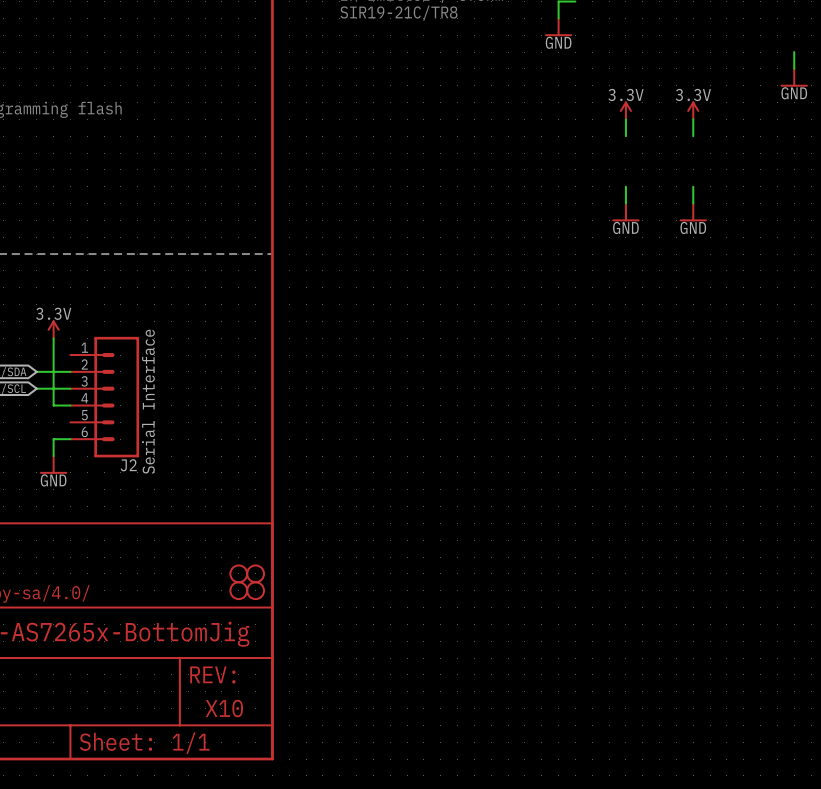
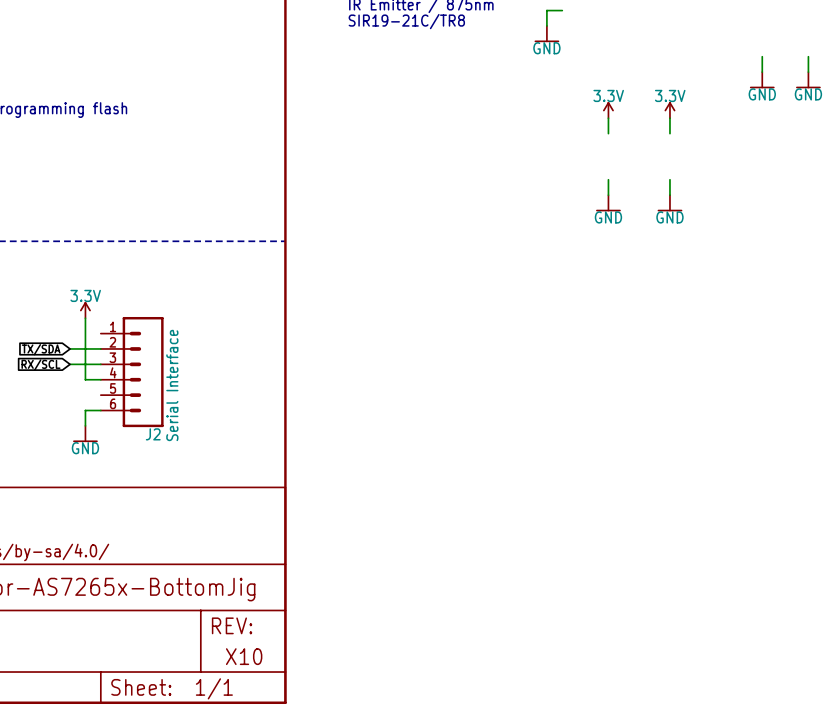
part: (238, 573) -> none
part: (255, 573) -> none
part: (238, 590) -> none
part: (255, 590) -> none

